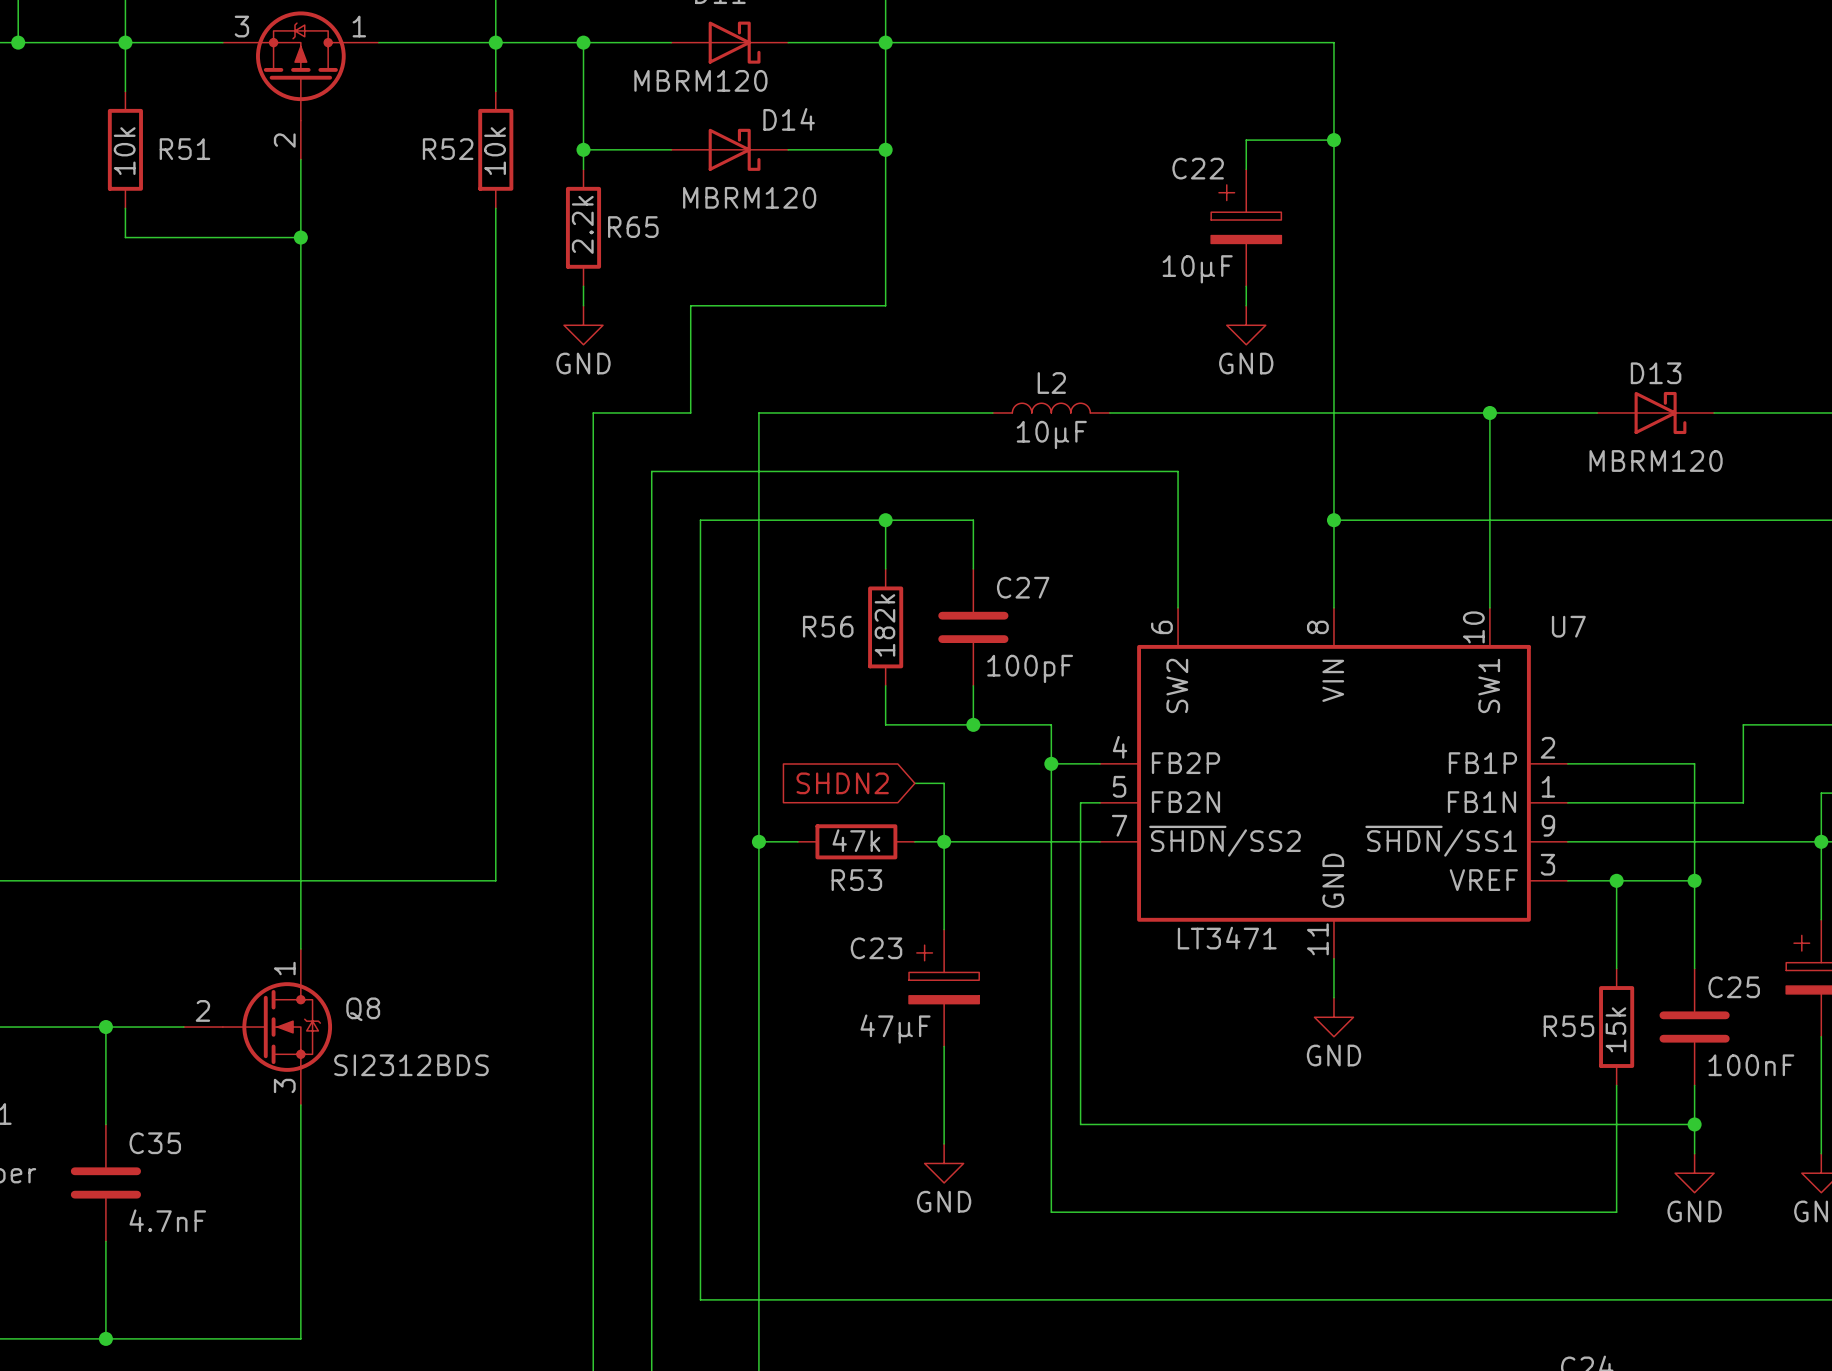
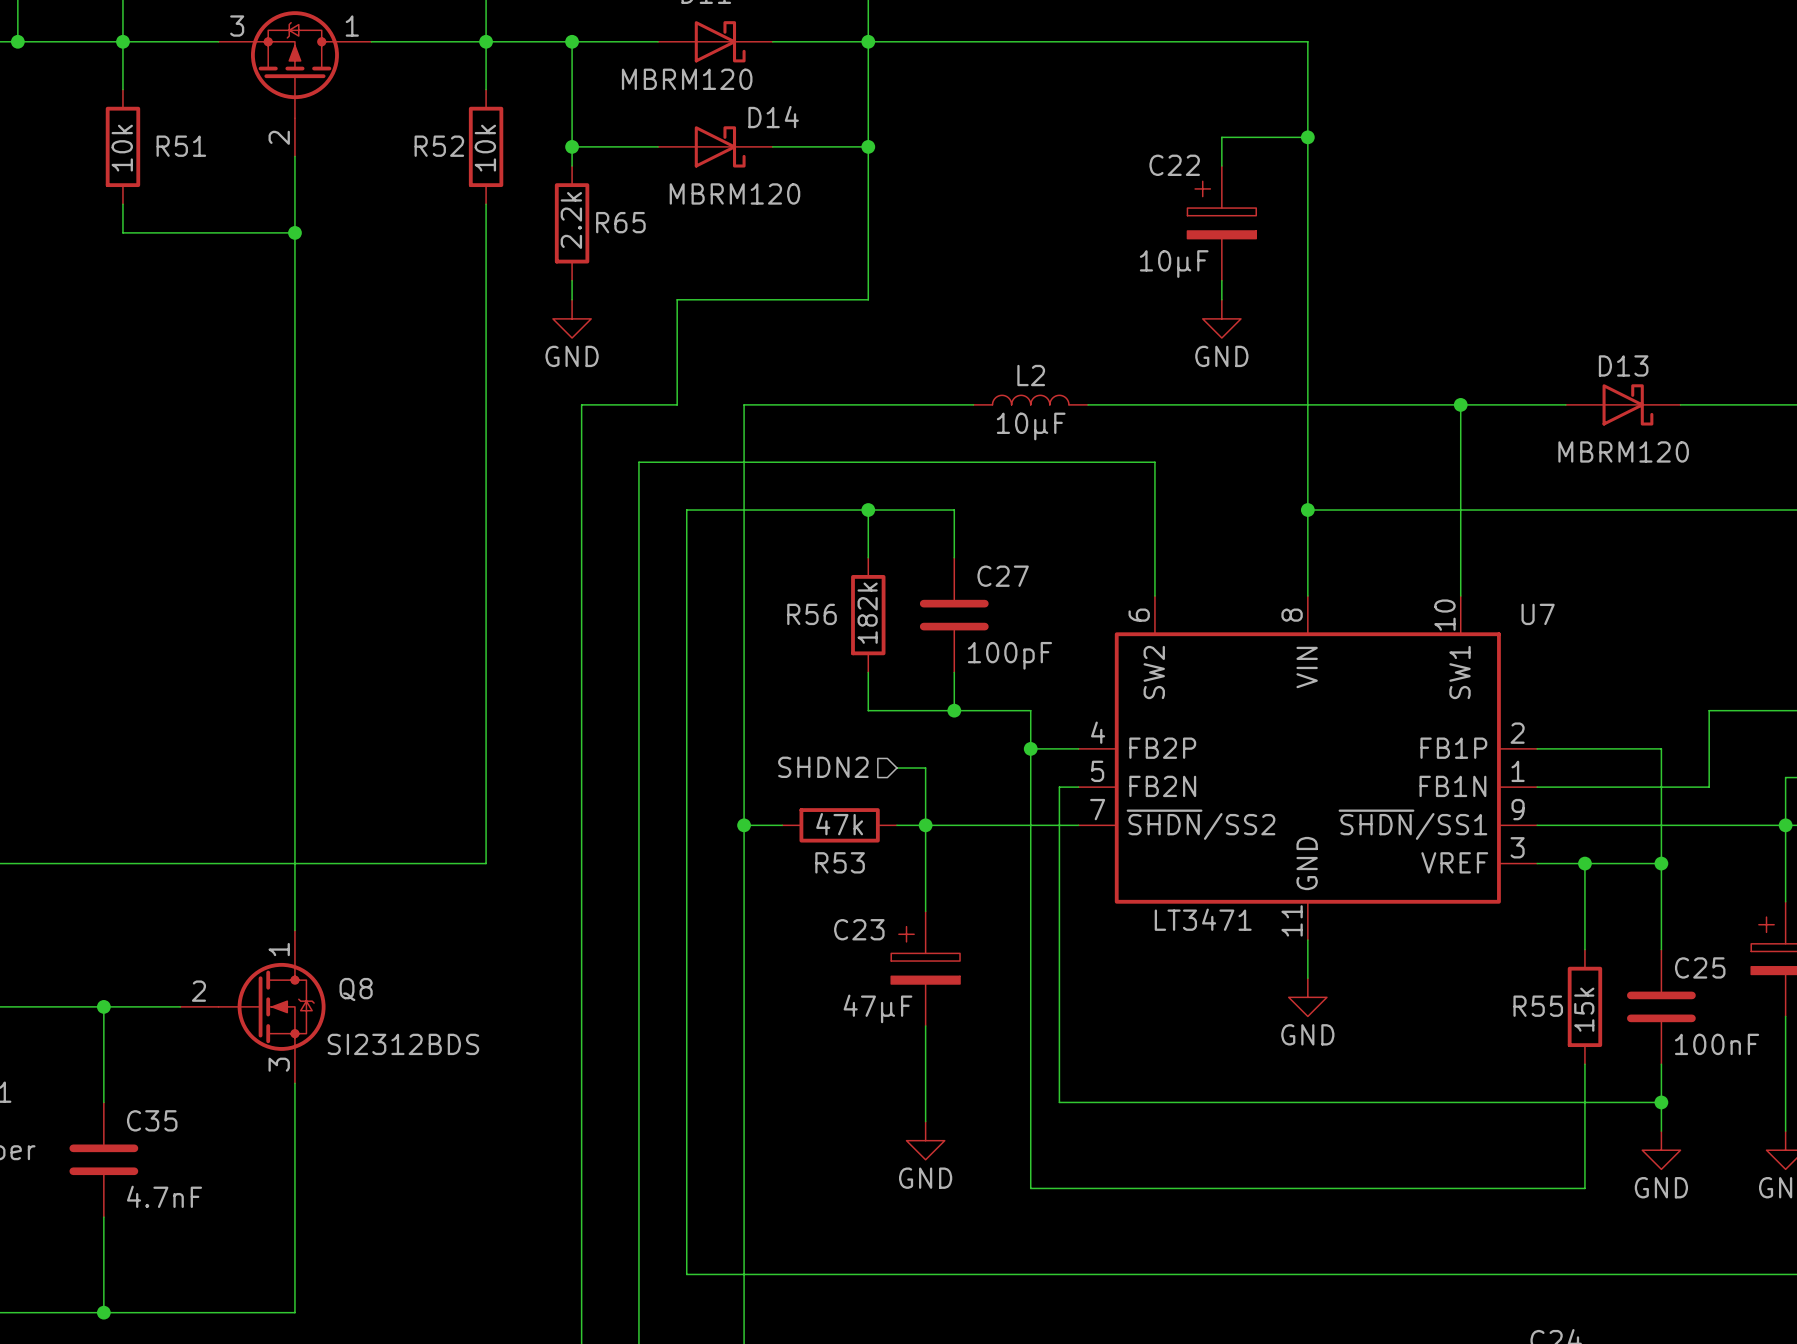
hierarchical label: none -> SHDN2 (823, 767)
global label: SHDN2 (842, 783) -> none

